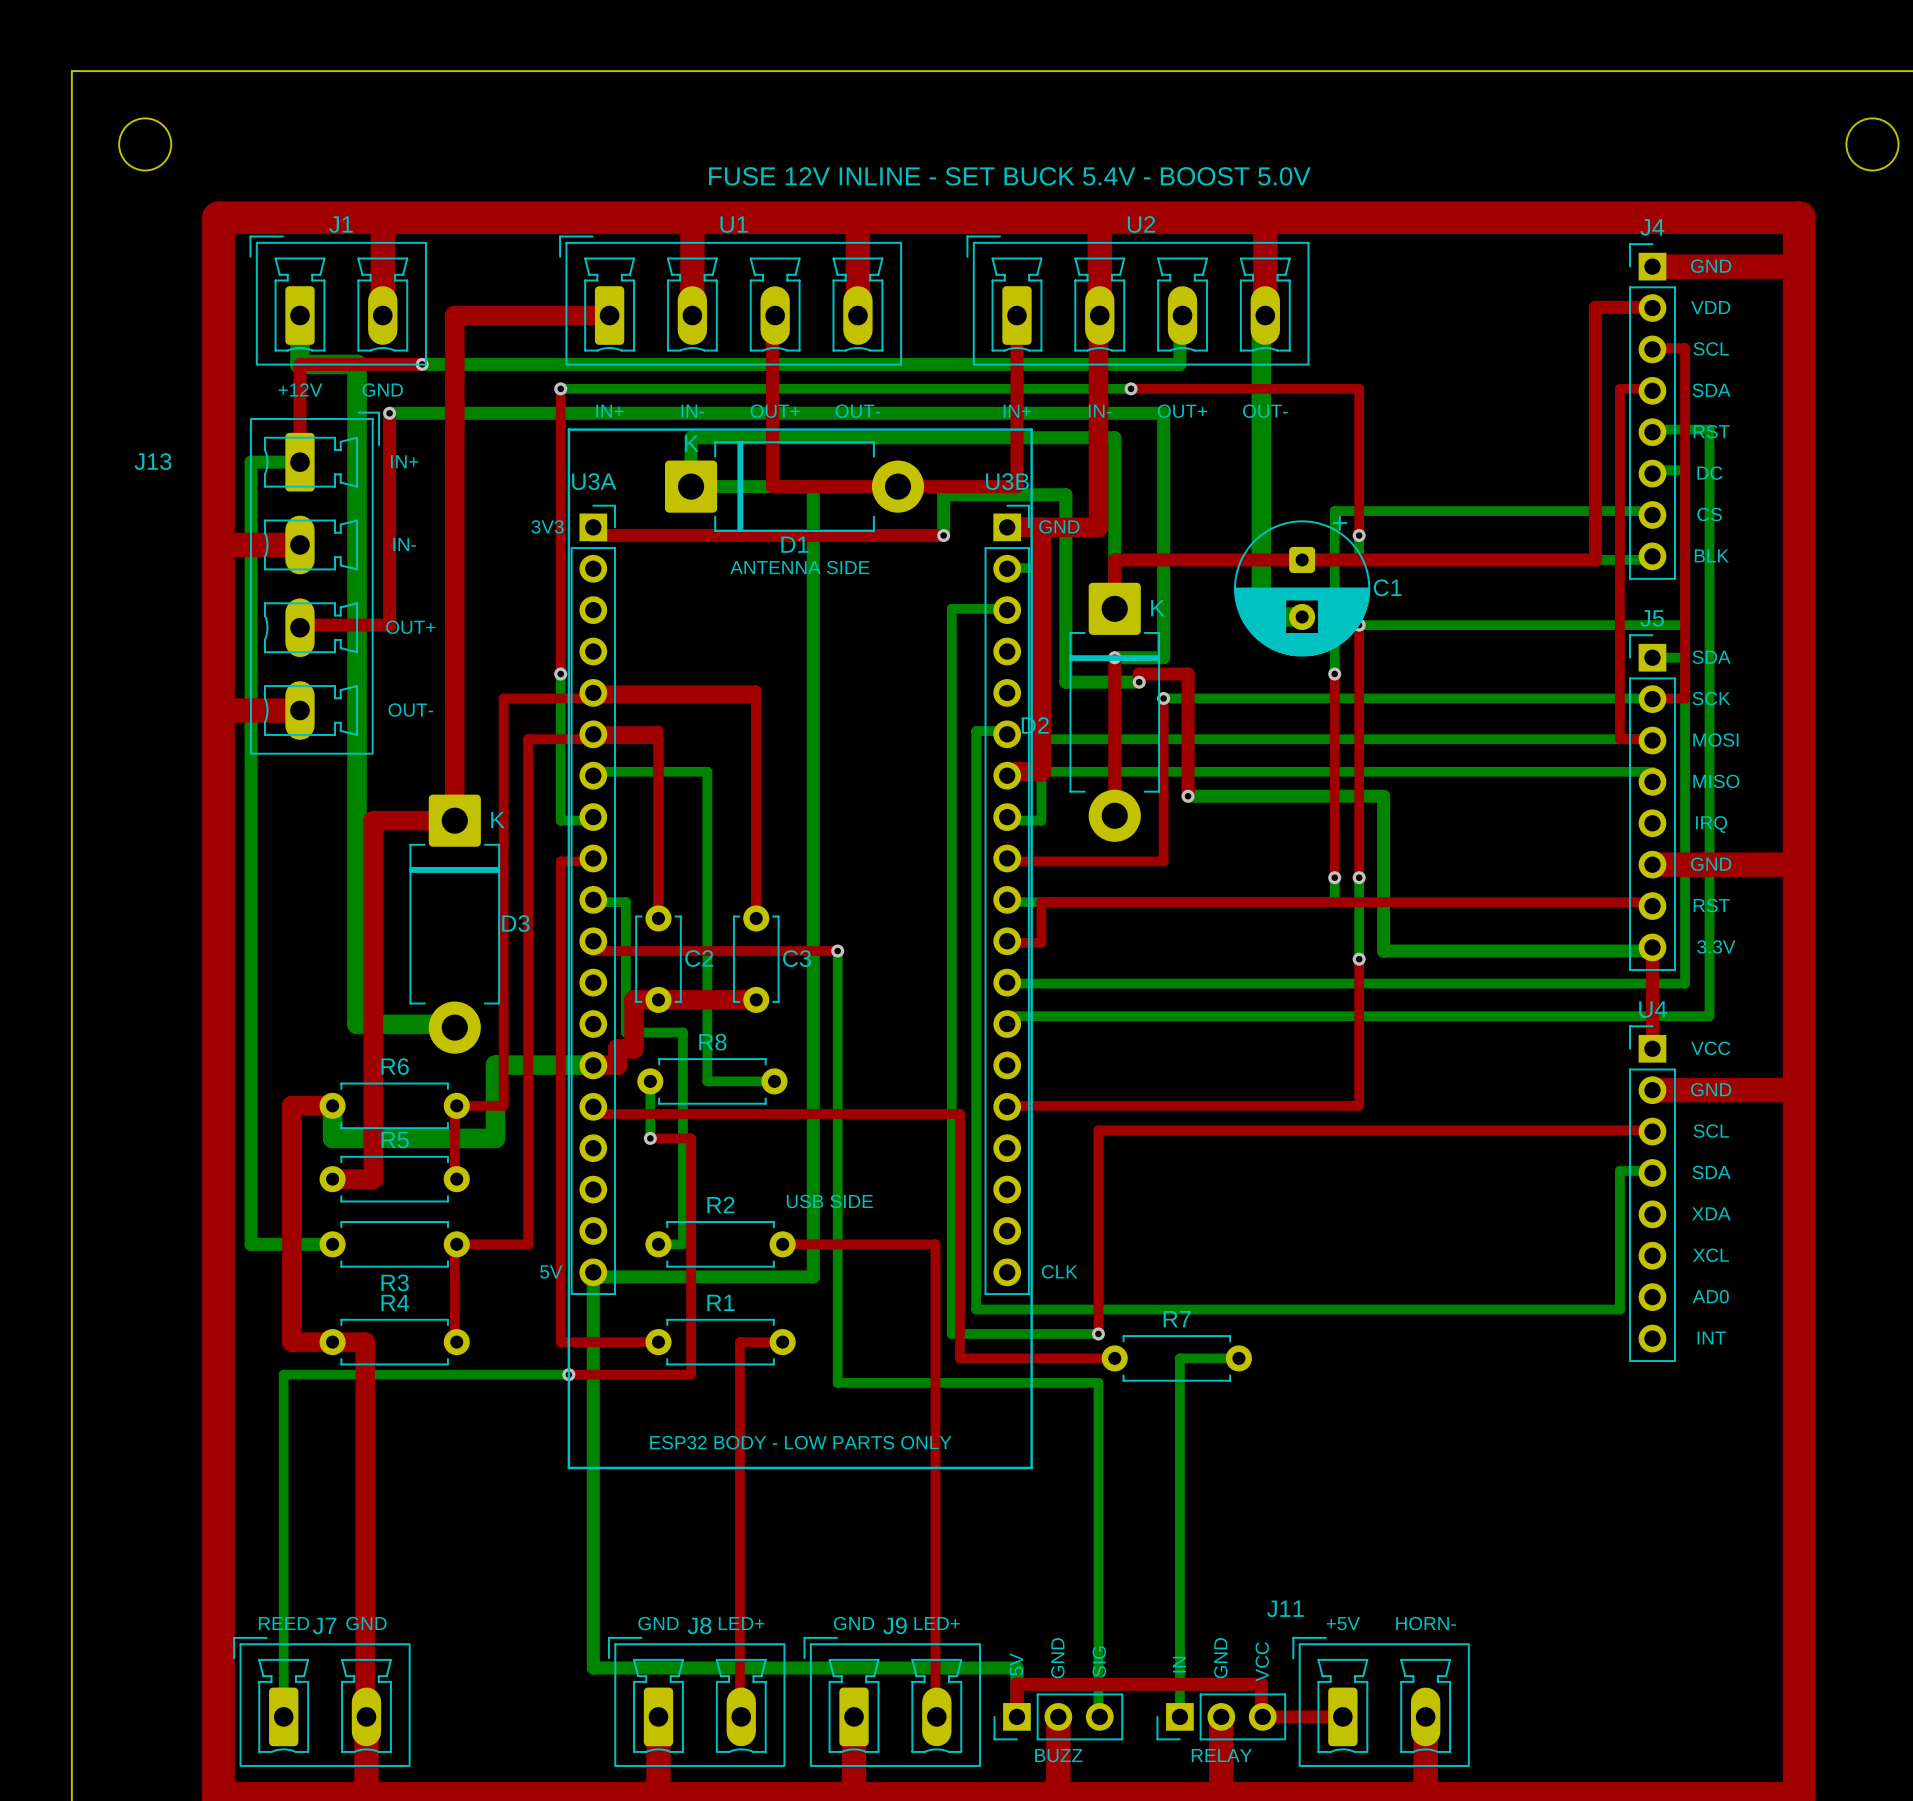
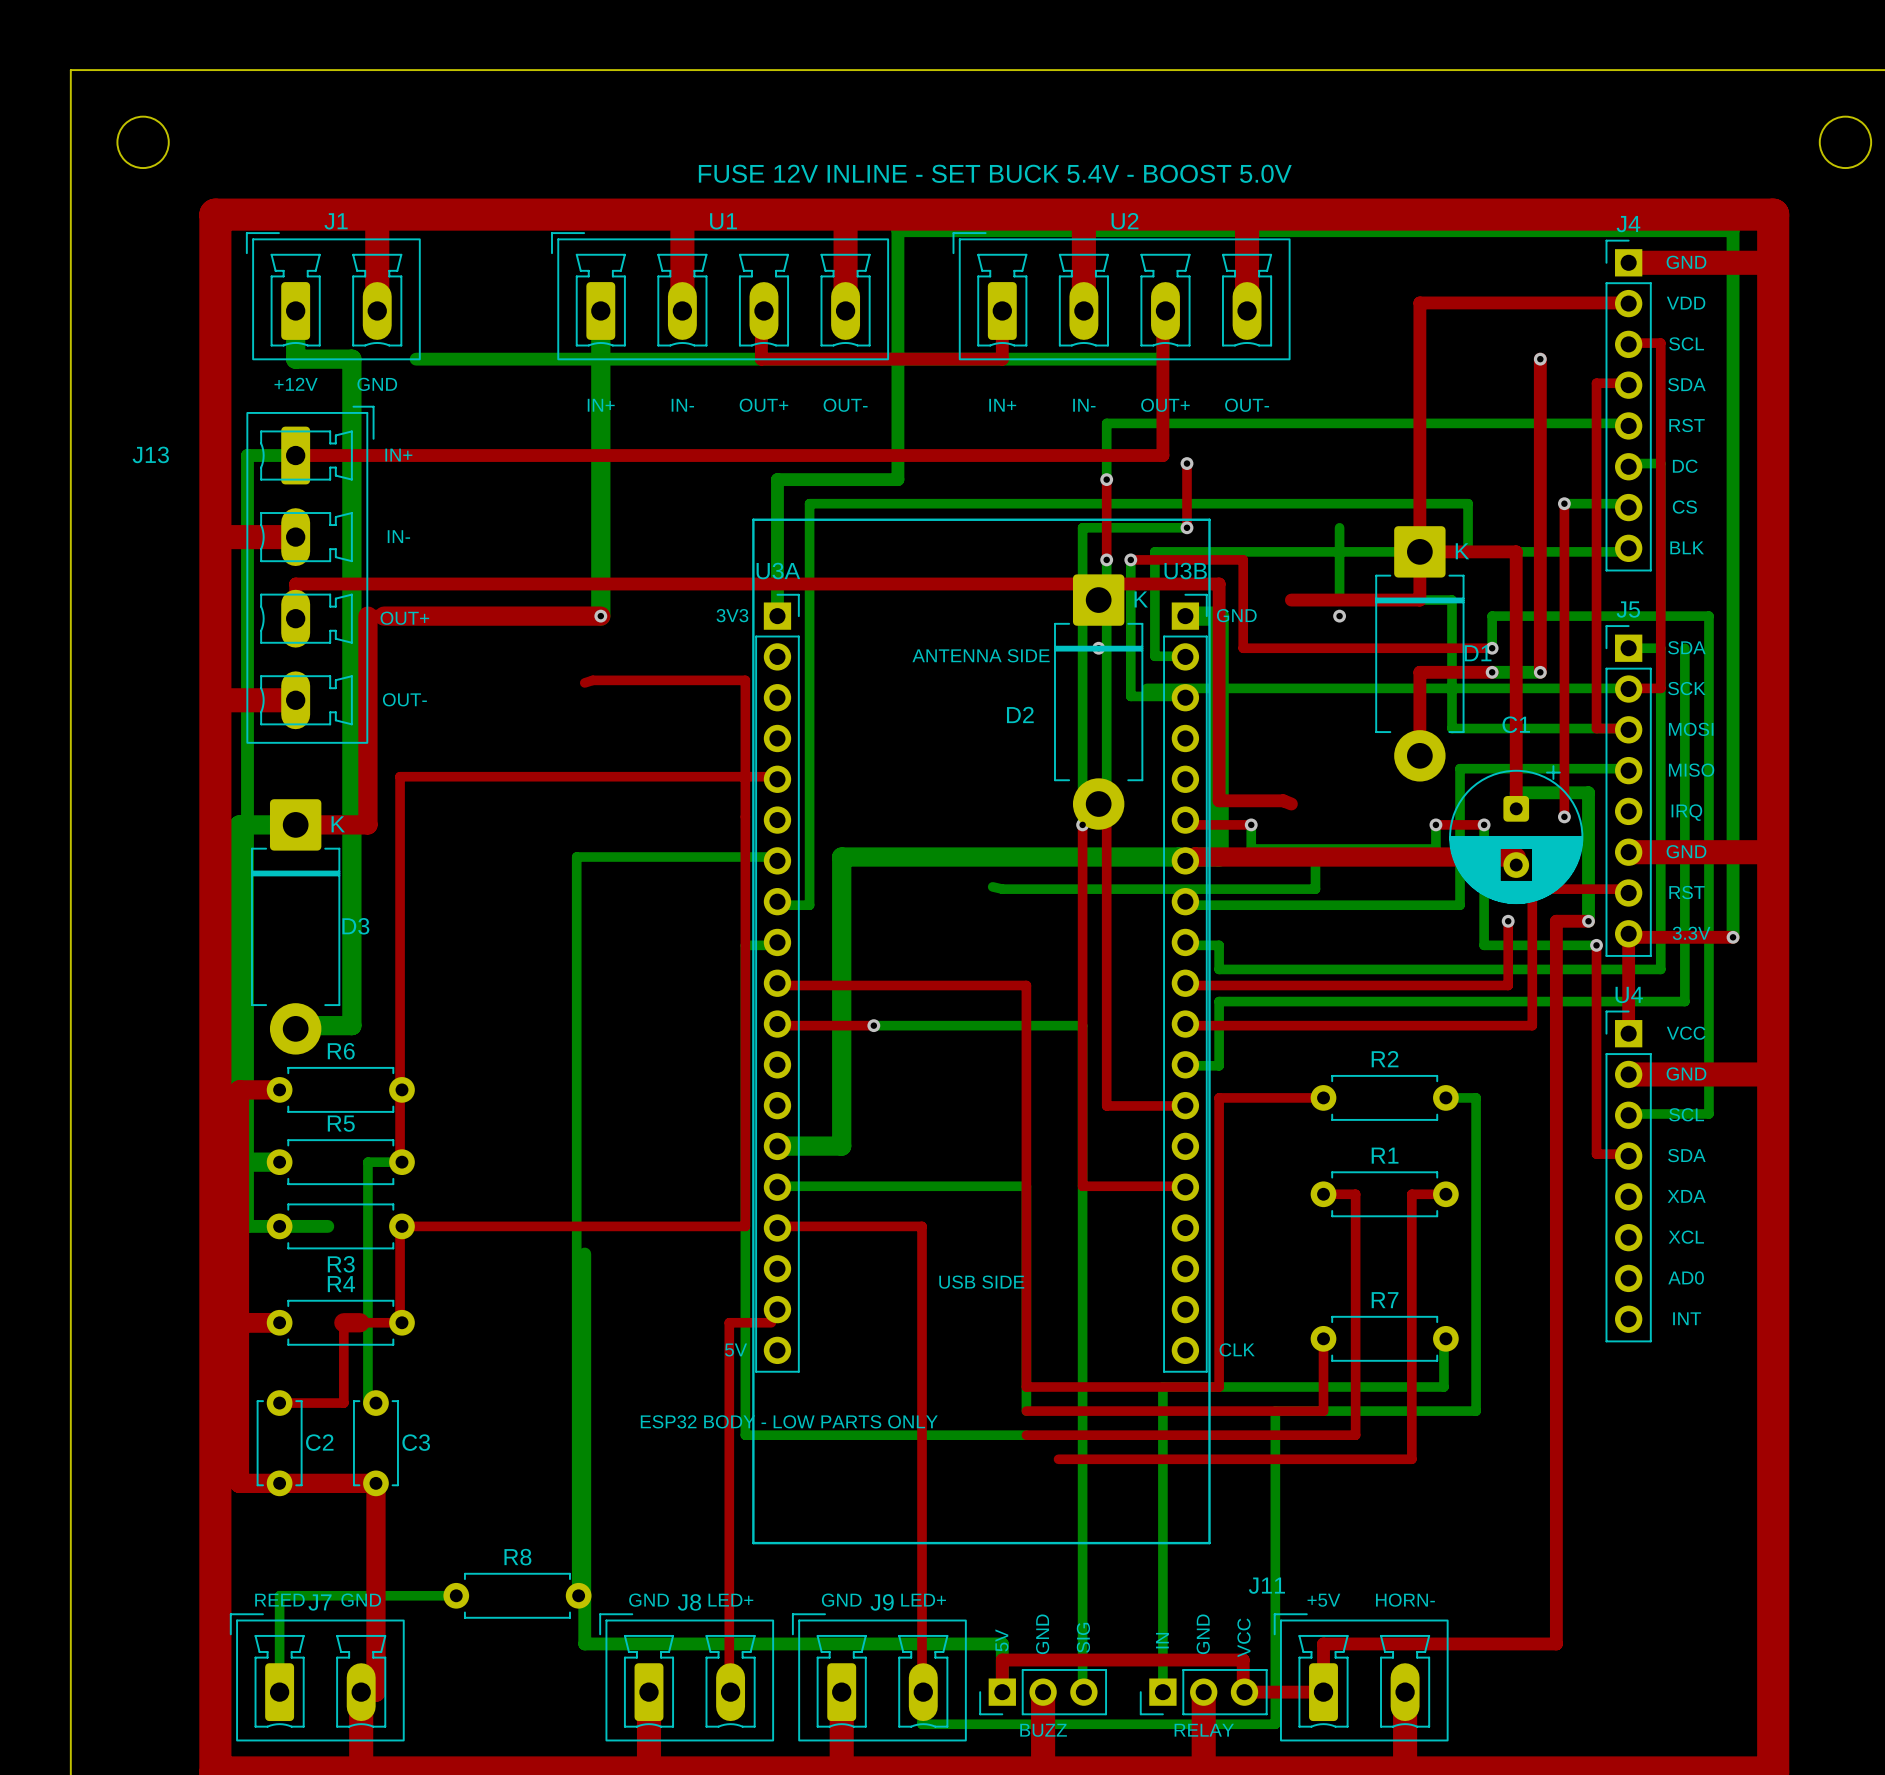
top track: (1595, 307) (1595, 559) (1538, 559) -> (1572, 302) (1419, 302) (1419, 600) (1291, 600)
top track: (609, 315) (454, 315) (454, 820) (373, 820) -> none
bottom track: none -> (600, 310) (600, 616)
top track: (1099, 315) (1098, 527) (1007, 527) -> none
bottom track: (1265, 315) (1261, 323) (1261, 616) (1302, 616) -> none
top track: (422, 364) (299, 364) (299, 462) -> (1165, 310) (1162, 319) (1162, 455) (295, 455)
via: (422, 364) -> none
top track: (772, 364) (772, 486) (1016, 486) (1016, 364) -> (761, 359) (1002, 359)
top track: none -> (1540, 359) (1540, 672)
via: none -> (1540, 359)
top track: (560, 388) (560, 674) -> none
bottom track: (560, 388) (1131, 388) -> none
via: (560, 388) -> none
top track: (1131, 388) (1359, 388) (1359, 535) -> none
via: (1131, 388) -> none
top track: (389, 413) (389, 625) -> (600, 616) (384, 616)
bottom track: (389, 413) (1163, 413) (1163, 657) (1114, 657) -> none
via: (389, 413) -> none
line: (568, 429) (1031, 429) (1031, 1467) (568, 1467) (568, 429) -> (753, 519) (1209, 519) (1209, 1543) (753, 1543) (753, 519)
bottom track: (1652, 432) (1660, 429) (1709, 429) (1709, 657) -> (1628, 425) (1620, 423) (1106, 423) (1106, 479)
top track: none -> (1187, 463) (1187, 527)
via: none -> (1187, 463)
bottom track: (788, 486) (691, 486) (691, 437) (1114, 437) (1114, 608) -> (777, 479) (777, 616)
D1 rotation: 0° (794, 486) -> 90° clockwise (1419, 653)
D1 position: (794, 486) -> (1419, 653)
bottom track: (813, 486) (813, 1276) (593, 1276) -> (801, 479) (897, 479) (897, 230) (1733, 230) (1733, 937)
top track: none -> (1106, 479) (1106, 559)
via: none -> (1106, 479)
bottom track: (1334, 511) (1334, 674) -> (1315, 503) (809, 503) (809, 905) (785, 905) (777, 901)
bottom track: (1489, 511) (1587, 511) -> (1468, 503) (1468, 551)
top track: none -> (1564, 503) (1564, 816)
via: none -> (1564, 503)
text position: 3V3 (547, 526) -> 3V3 (732, 615)
text position: GND (1059, 526) -> GND (1236, 615)
top track: (593, 527) (593, 535) (943, 535) -> none
top track: (1041, 527) (1041, 771) (1016, 771) (1007, 775) -> none
bottom track: (943, 535) (943, 494) (1065, 494) (1065, 682) (1139, 682) -> none
via: (943, 535) -> none
bottom track: none -> (1187, 527) (1082, 527) (1082, 824)
via: none -> (1187, 527)
via: (1359, 535) -> none
D1 name position: D1 (794, 544) -> D1 (1478, 653)
top track: (1440, 559) (1114, 559) (1114, 608) -> none
top track: none -> (1516, 551) (1516, 808)
text position: ANTENNA SIDE (799, 567) -> ANTENNA SIDE (981, 655)
bottom track: (1007, 568) (1041, 568) (1041, 739) (1473, 739) -> (1185, 656) (1154, 656) (1154, 551) (1339, 551) (1339, 600) (1451, 600) (1451, 728)
bottom track: none -> (1106, 559) (1106, 824)
via: none -> (1106, 559)
top track: none -> (1130, 559) (1243, 559) (1243, 648) (1492, 648)
bottom track: none -> (1130, 559) (1130, 696) (1185, 697)
via: none -> (1130, 559)
C1 position: (1302, 586) -> (1516, 834)
C1 name position: C1 (1387, 587) -> C1 (1516, 724)
bottom track: (1007, 610) (951, 608) (951, 1333) (1098, 1333) -> none
top track: (373, 625) (308, 625) (299, 627) -> (367, 616) (367, 808)
bottom track: none -> (1185, 616) (1219, 616) (1219, 857) (1195, 857) (1185, 860) (1178, 857) (841, 857) (841, 1146) (777, 1146)
top track: (1359, 625) (1359, 877) -> none
bottom track: (1359, 625) (1513, 625) -> (1492, 648) (1492, 616)
bottom track: none -> (1660, 616) (1708, 616) (1708, 1113) (1628, 1115)
top track: none -> (295, 618) (295, 584) (1219, 584) (1219, 800) (1283, 800) (1291, 804)
top track: (1114, 657) (1114, 815) -> none
via: none -> (1492, 648)
bottom track: (560, 674) (560, 820) (585, 820) (593, 817) -> none
via position: (560, 674) -> (600, 616)
top track: (1334, 674) (1334, 877) -> none
via: (1334, 674) -> none
top track: (1139, 682) (1139, 674) (1188, 674) (1188, 796) -> none
via: (1139, 682) -> none
top track: none -> (1492, 672) (1419, 672) (1419, 755)
bottom track: none -> (1492, 672) (1540, 672)
via: none -> (1492, 672)
via: none -> (1540, 672)
top track: (756, 698) (503, 698) (503, 1105) (456, 1105) (454, 1113) (454, 1171) (456, 1179) -> none
top track: (1163, 698) (1163, 861) (1016, 861) (1007, 858) -> none
via: (1163, 698) -> none
top track: (593, 734) (601, 731) (658, 731) (658, 918) -> none
bottom track: (1007, 734) (1000, 731) (976, 731) (976, 1309) (1619, 1309) (1619, 1171) (1652, 1172) -> none
top track: (658, 739) (528, 739) (528, 1244) -> (745, 905) (745, 1226) (520, 1226)
bottom track: (593, 775) (601, 771) (707, 771) (707, 1081) (774, 1081) -> none
bottom track: (1652, 781) (1652, 771) (1041, 771) (1041, 820) (1016, 820) (1007, 817) -> (1628, 770) (1620, 768) (1460, 768) (1460, 905) (1195, 905) (1185, 901)
top track: none -> (777, 779) (769, 776) (400, 776) (400, 1081) (401, 1089) (400, 1097) (400, 1154) (401, 1162)
bottom track: (1188, 796) (1383, 796) (1383, 951) (1644, 951) (1652, 947) -> none
via: (1188, 796) -> none
bottom track: none -> (1516, 808) (1516, 792) (1588, 792) (1588, 921)
via: none -> (1564, 816)
top track: none -> (1185, 820) (1187, 824) (1251, 824)
bottom track: none -> (295, 824) (239, 824) (239, 1162) (279, 1162)
top track: (373, 836) (373, 1179) (332, 1179) -> (367, 824) (295, 824)
via: none -> (1082, 824)
top track: none -> (1106, 824) (1106, 1105) (1185, 1105)
bottom track: none -> (1251, 824) (1251, 848) (1435, 848) (1435, 824)
via: none -> (1251, 824)
top track: none -> (1435, 824) (1484, 824)
via: none -> (1435, 824)
bottom track: none -> (1484, 824) (1484, 945) (1596, 945)
via: none -> (1484, 824)
top track: (593, 858) (585, 861) (560, 861) (560, 1342) (658, 1342) -> none
top track: none -> (1516, 857) (1195, 857) (1185, 860)
bottom track: none -> (777, 860) (769, 857) (576, 857) (576, 1587) (578, 1595)
via: (1334, 877) -> none
bottom track: (1359, 877) (1359, 959) -> none
via: (1359, 877) -> none
bottom track: (593, 899) (601, 902) (625, 902) (625, 1032) (682, 1032) (682, 1244) (658, 1244) -> none
U3A position: (593, 899) -> (777, 983)
U3B position: (1007, 899) -> (1185, 983)
top track: (1554, 902) (1041, 902) (1041, 942) (1007, 941) -> (1532, 889) (1532, 1025) (1195, 1025) (1185, 1024)
D3 position: (454, 924) -> (295, 926)
top track: none -> (1508, 921) (1508, 985) (1195, 985) (1185, 983)
via: none -> (1508, 921)
top track: none -> (1588, 921) (1556, 921) (1556, 1643) (1323, 1643) (1323, 1692)
via: none -> (1588, 921)
top track: (593, 941) (593, 951) (837, 951) -> none
top track: none -> (1628, 933) (1636, 937) (1733, 937)
bottom track: (837, 951) (837, 1382) (1098, 1382) -> (873, 1025) (1082, 1025) (1082, 1362)
via: (837, 951) -> none
via: none -> (1733, 937)
bottom track: none -> (777, 942) (769, 945) (745, 945) (745, 1435) (1026, 1435)
C2 position: (658, 959) -> (279, 1443)
C3 position: (756, 959) -> (375, 1443)
top track: (1359, 959) (1359, 1105) (1007, 1106) -> none
via: (1359, 959) -> none
top track: none -> (1596, 945) (1596, 1154) (1628, 1156)
via: none -> (1596, 945)
bottom track: (1007, 982) (1236, 983) -> (1185, 942) (1195, 945) (1219, 945) (1219, 969)
top track: none -> (777, 983) (785, 985) (1026, 985) (1026, 1387) (1219, 1387) (1219, 1097) (1323, 1097)
top track: (756, 999) (634, 999) (634, 1048) (617, 1048) (617, 1065) (593, 1065) -> none
bottom track: (1236, 1016) (1008, 1016) (1007, 1024) -> (1219, 1001) (1219, 1065) (1185, 1064)
bottom track: (357, 1024) (446, 1024) (454, 1027) -> (351, 1009) (351, 1025) (303, 1025) (295, 1028)
top track: none -> (777, 1024) (873, 1025)
via: none -> (873, 1025)
bottom track: (593, 1065) (495, 1065) (495, 1138) (332, 1138) (332, 1105) -> none
bottom track: (650, 1081) (650, 1138) -> none
R8 position: (712, 1081) -> (517, 1595)
top track: (332, 1105) (291, 1105) (291, 1342) (348, 1342) -> (279, 1403) (343, 1403) (343, 1322)
R6 position: (394, 1105) -> (340, 1089)
top track: (593, 1106) (593, 1113) (959, 1113) (959, 1358) (1114, 1358) -> none
bottom track: none -> (1445, 1097) (1476, 1097) (1476, 1411) (1275, 1411) (1275, 1724) (922, 1724) (923, 1692)
top track: (1098, 1130) (1652, 1131) -> (1082, 1113) (1082, 824)
top track: (650, 1138) (691, 1138) (691, 1374) (568, 1374) -> none
via: (650, 1138) -> none
R5 position: (394, 1179) -> (340, 1162)
bottom track: none -> (401, 1162) (367, 1162) (367, 1403) (375, 1403)
text position: USB SIDE (829, 1201) -> USB SIDE (981, 1282)
top track: (1098, 1203) (1098, 1333) -> (1082, 1186) (1185, 1187)
bottom track: none -> (777, 1187) (1026, 1186) (1026, 1411)
top track: none -> (1323, 1194) (1355, 1194) (1355, 1435) (1026, 1435)
top track: none -> (1445, 1194) (1411, 1194) (1411, 1459) (1058, 1459)
R3 position: (394, 1244) -> (340, 1226)
top track: (456, 1244) (454, 1252) (454, 1333) (456, 1342) -> (450, 1226) (401, 1226) (400, 1234) (400, 1314) (401, 1322) (359, 1322)
R2 position: (720, 1244) -> (1384, 1097)
text position: 5V (551, 1271) -> 5V (736, 1349)
text position: CLK (1059, 1271) -> CLK (1237, 1349)
via: (1098, 1333) -> none
top track: (365, 1342) (366, 1716) -> (279, 1089) (239, 1089) (239, 1483) (375, 1483) (375, 1692) (361, 1692)
R4 position: (394, 1342) -> (340, 1322)
R1 position: (720, 1342) -> (1384, 1194)
R7 position: (1176, 1358) -> (1384, 1338)
bottom track: (1238, 1358) (1179, 1358) (1179, 1407) -> (1445, 1338) (1443, 1346) (1443, 1387) (1162, 1387)
top track: none -> (1323, 1338) (1323, 1411) (1026, 1411)
bottom track: (568, 1374) (283, 1374) (283, 1619) -> (456, 1595) (279, 1595)
via: (568, 1374) -> none

